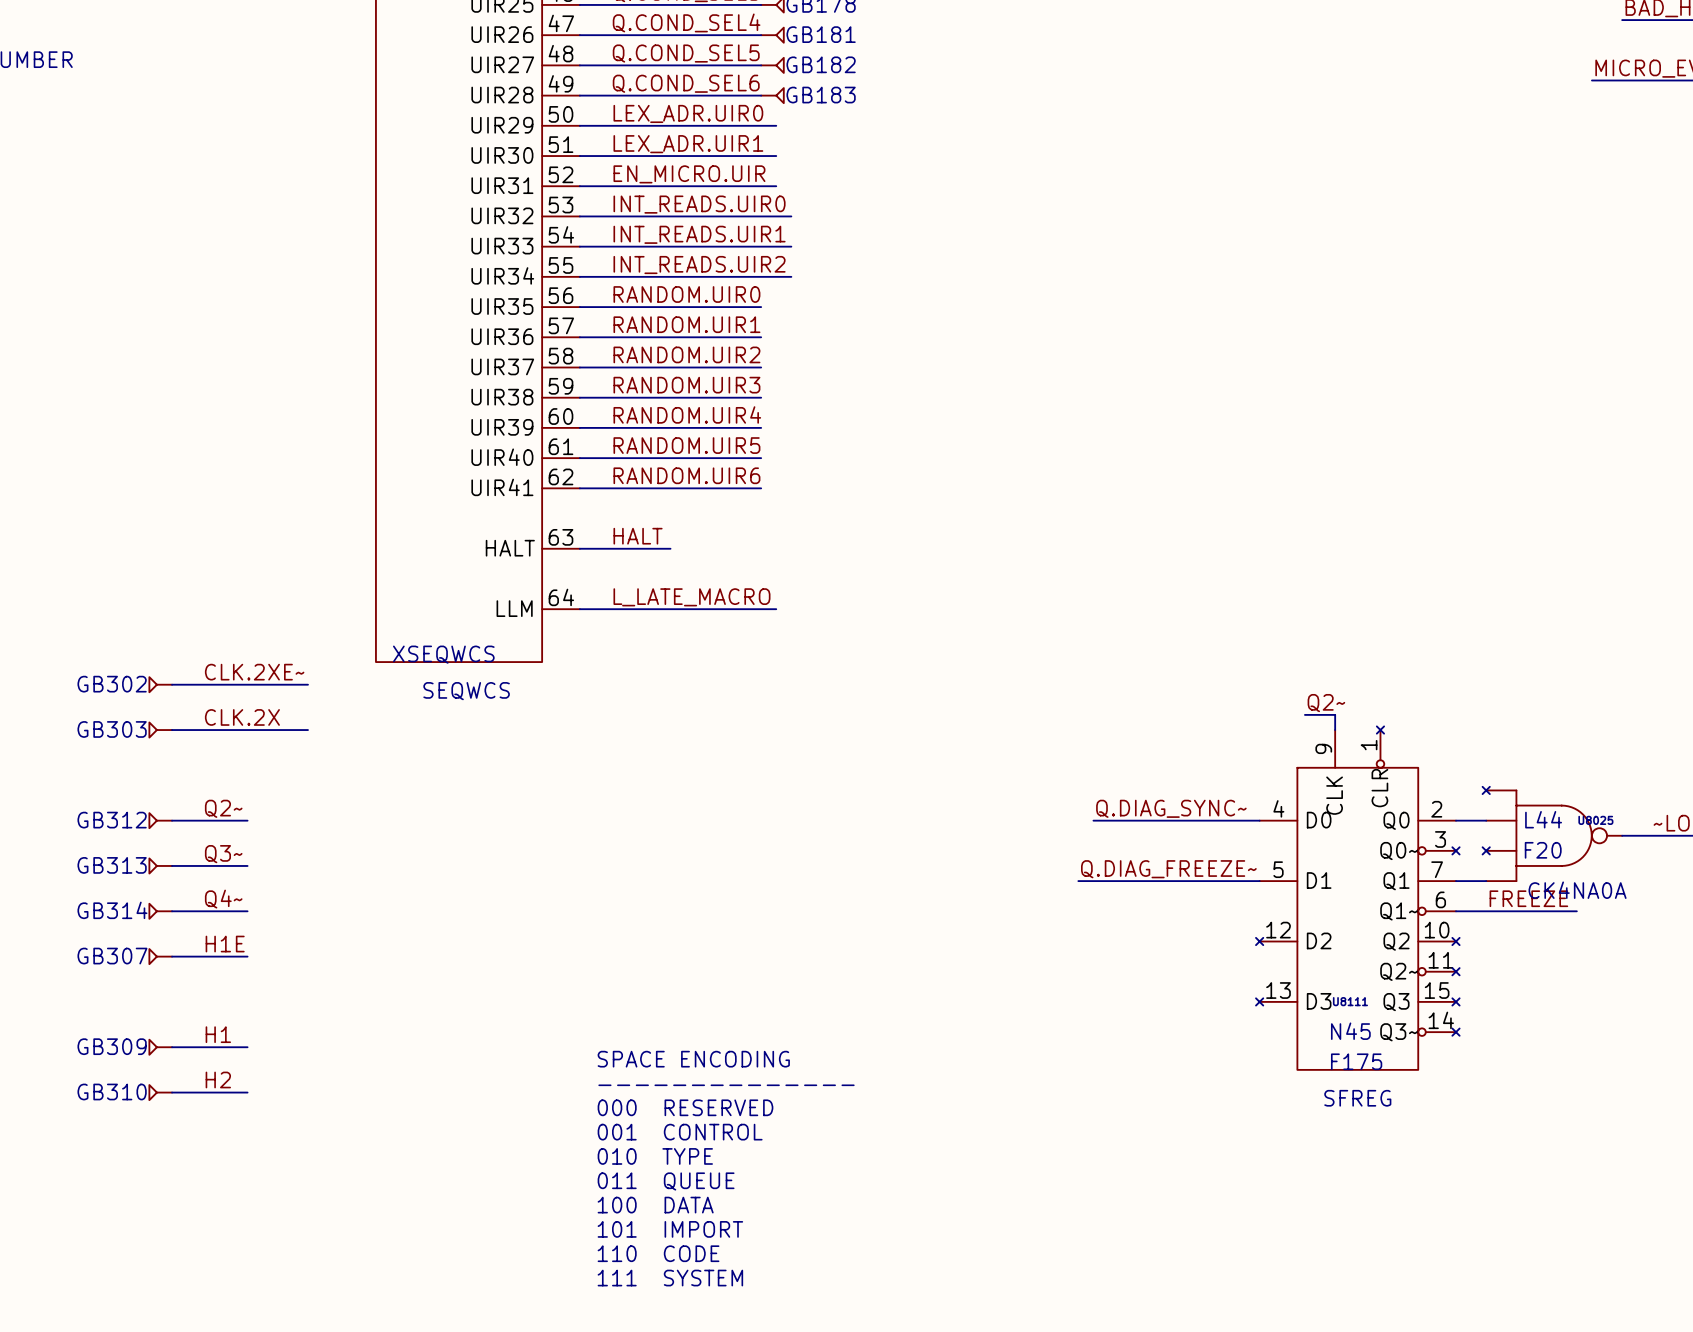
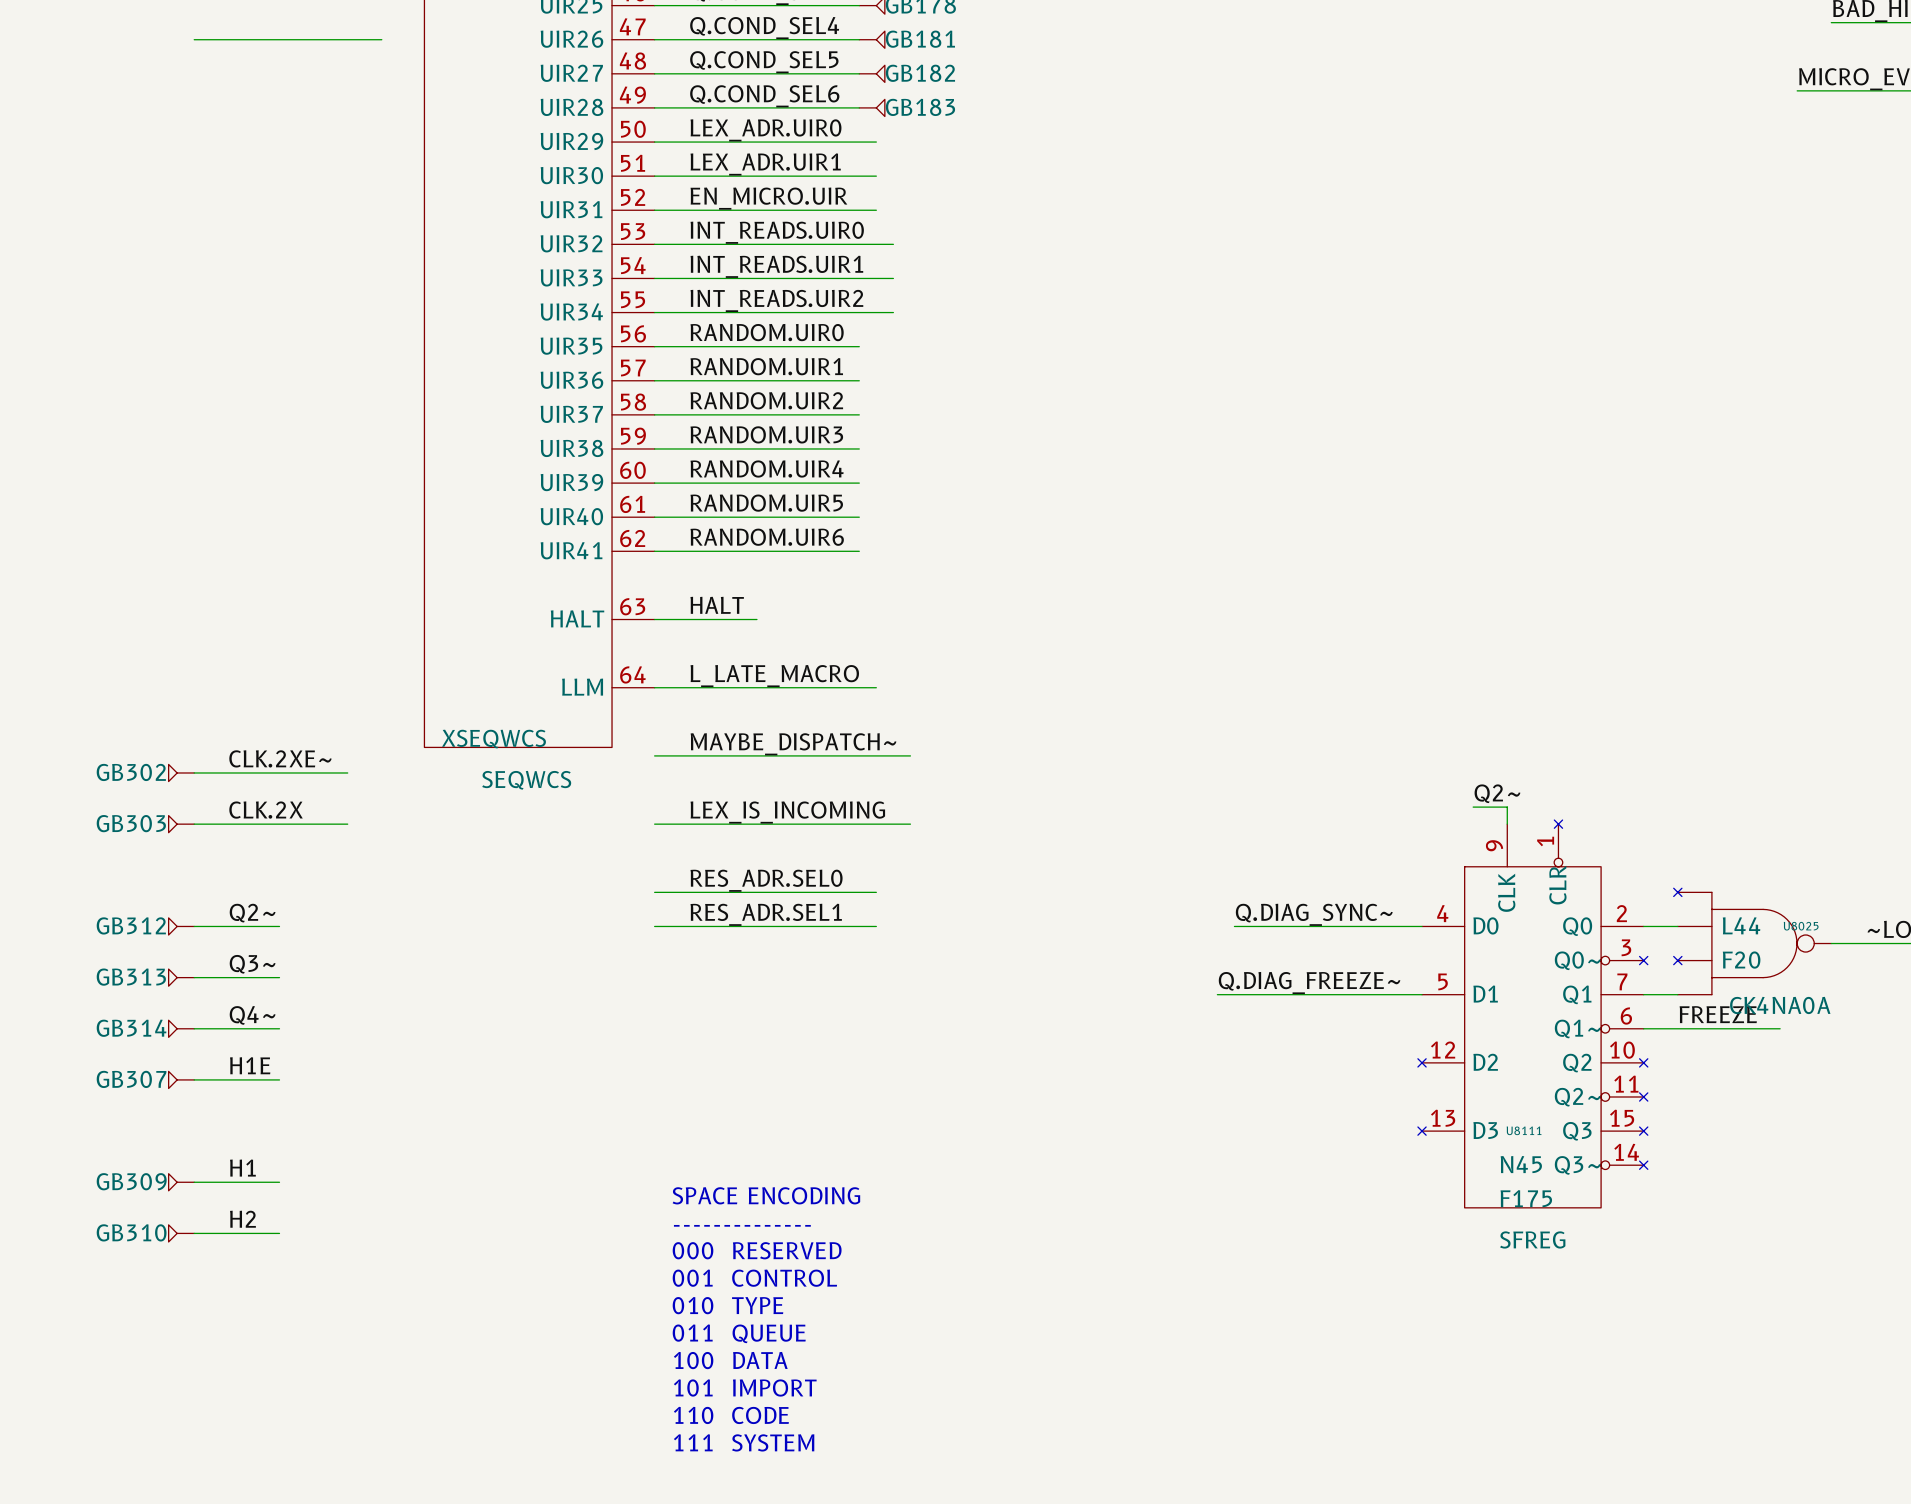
wire: none -> (194, 39) (381, 39)
label: none -> MAYBE_DISPATCH~ (793, 744)
wire: none -> (654, 755) (910, 755)
label: none -> LEX_IS_INCOMING (787, 812)
wire: none -> (654, 824) (910, 824)
label: none -> RES_ADR.SEL0 (766, 880)
wire: none -> (654, 892) (876, 892)
label: none -> RES_ADR.SEL1 (766, 914)
wire: none -> (654, 926) (876, 926)

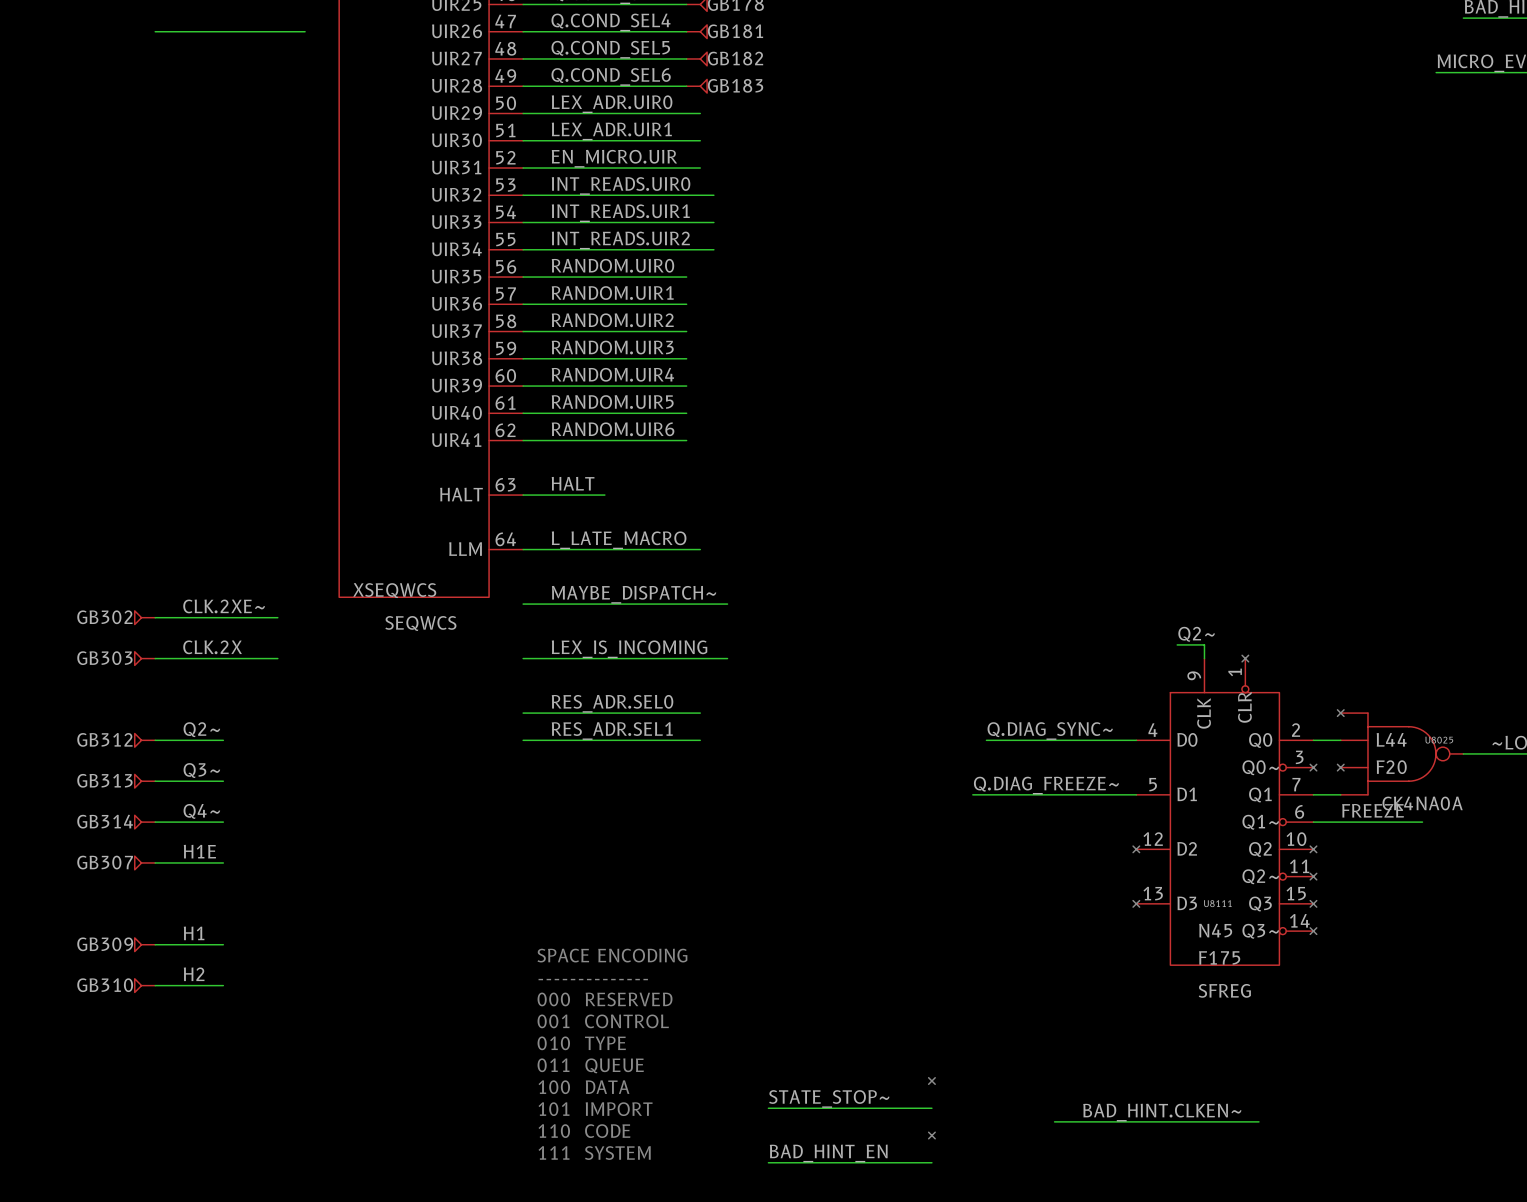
no-connect mark: none -> (931, 1081)
label: none -> STATE_STOP~ (829, 1098)
wire: none -> (768, 1108) (931, 1108)
label: none -> BAD_HINT.CLKEN~ (1162, 1112)
wire: none -> (1054, 1121) (1258, 1121)
no-connect mark: none -> (931, 1135)
label: none -> BAD_HINT_EN (828, 1153)
wire: none -> (768, 1162) (931, 1162)

